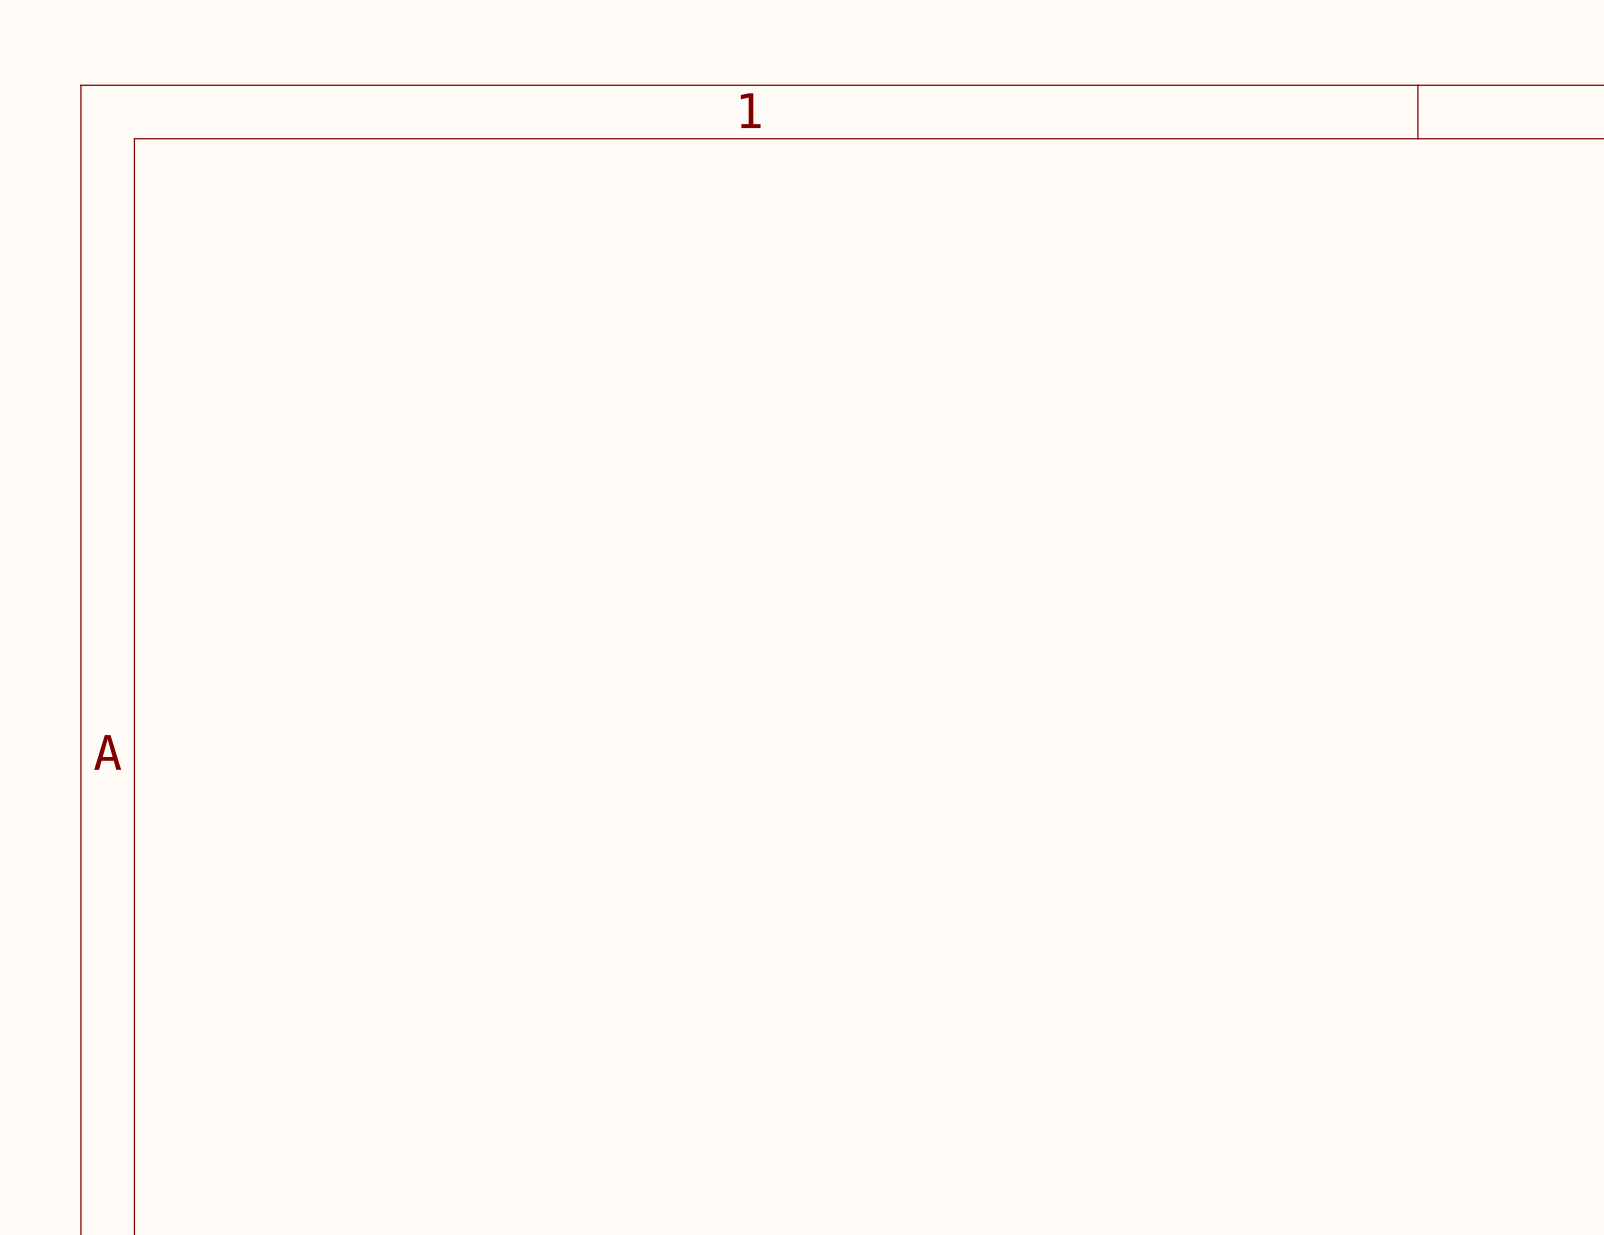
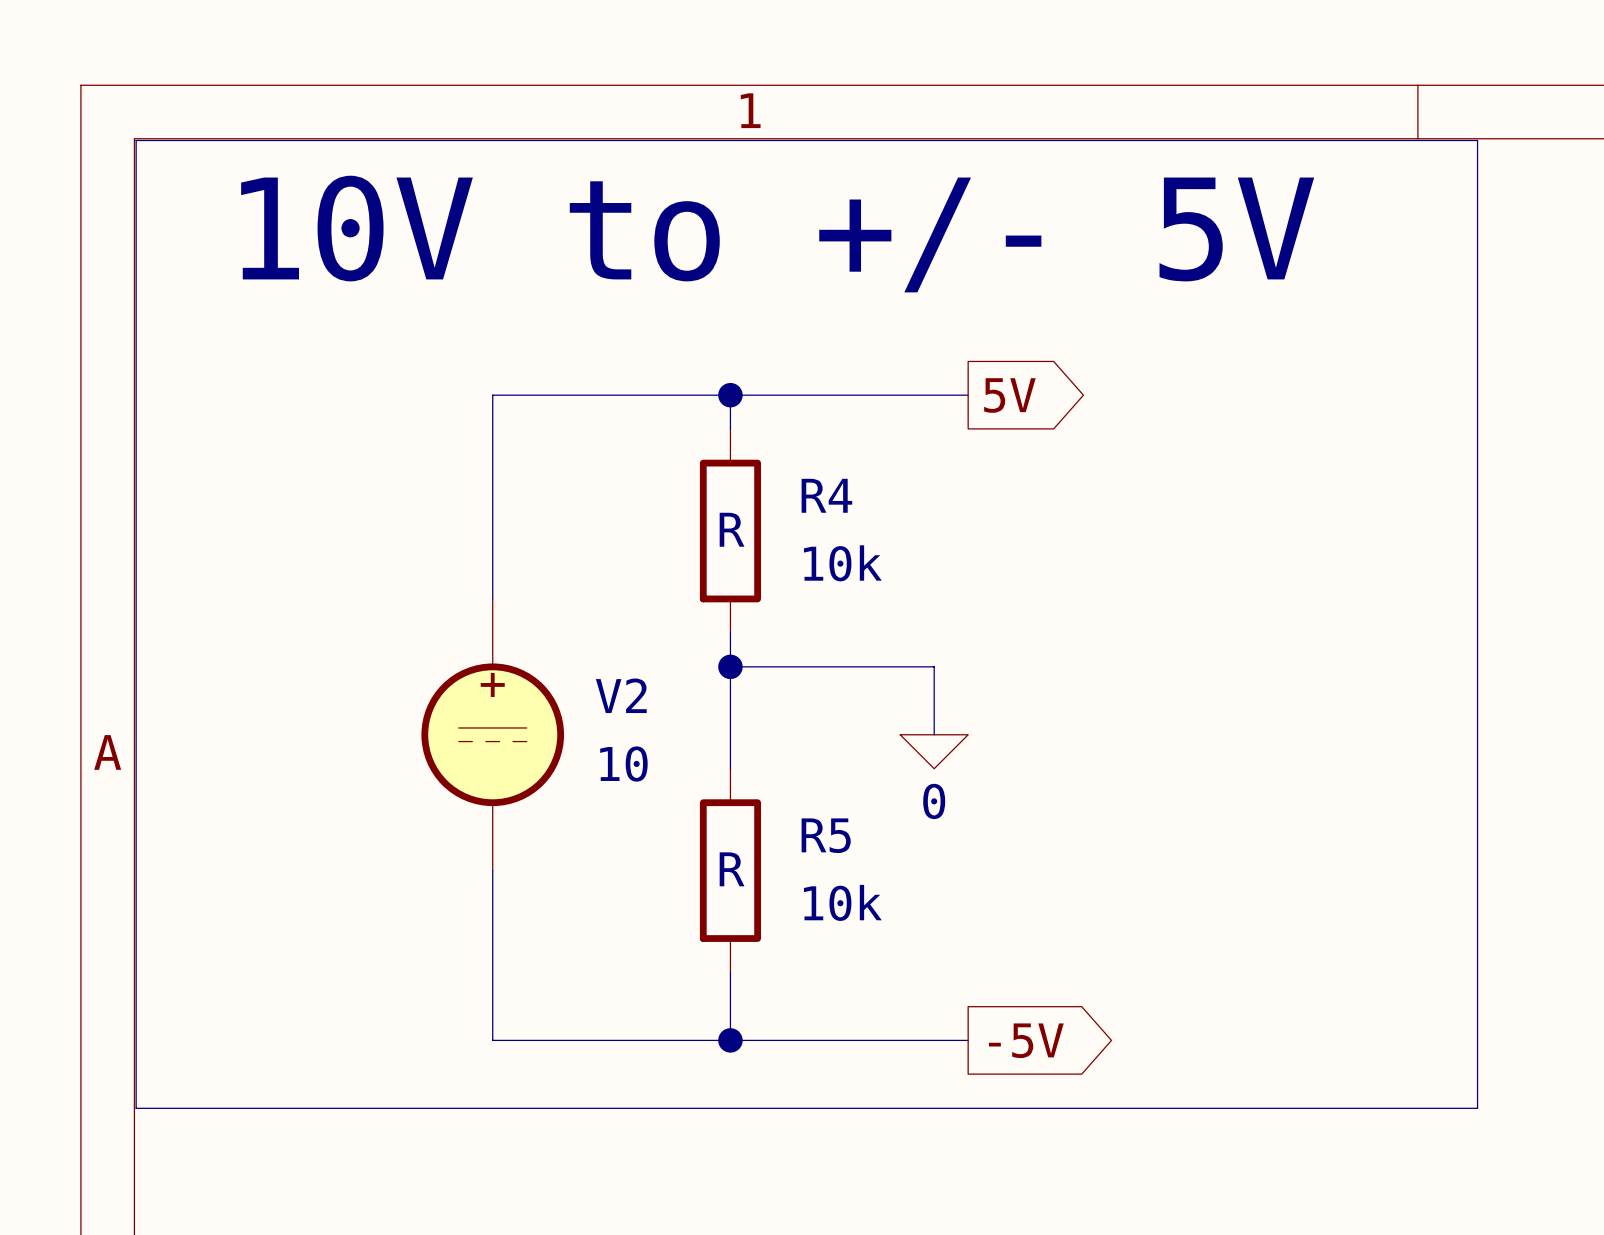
line: none -> (136, 140) (1477, 140) (1477, 1108) (136, 1108) (136, 140)
text: none -> 10V to +/- 5V (777, 234)
wire: none -> (730, 395) (730, 429)
junction: none -> (730, 395)
wire: none -> (968, 395) (492, 395) (492, 598)
global label: none -> 5V (1009, 395)
R4: none -> 10k (730, 531)
wire: none -> (730, 632) (730, 768)
wire: none -> (730, 666) (934, 666) (934, 734)
junction: none -> (730, 666)
V2: none -> 10 (492, 734)
power symbol: none -> 0 (934, 751)
wire: none -> (492, 870) (492, 1040) (968, 1040)
R5: none -> 10k (730, 870)
wire: none -> (730, 972) (730, 1040)
junction: none -> (730, 1040)
global label: none -> -5V (1026, 1040)

